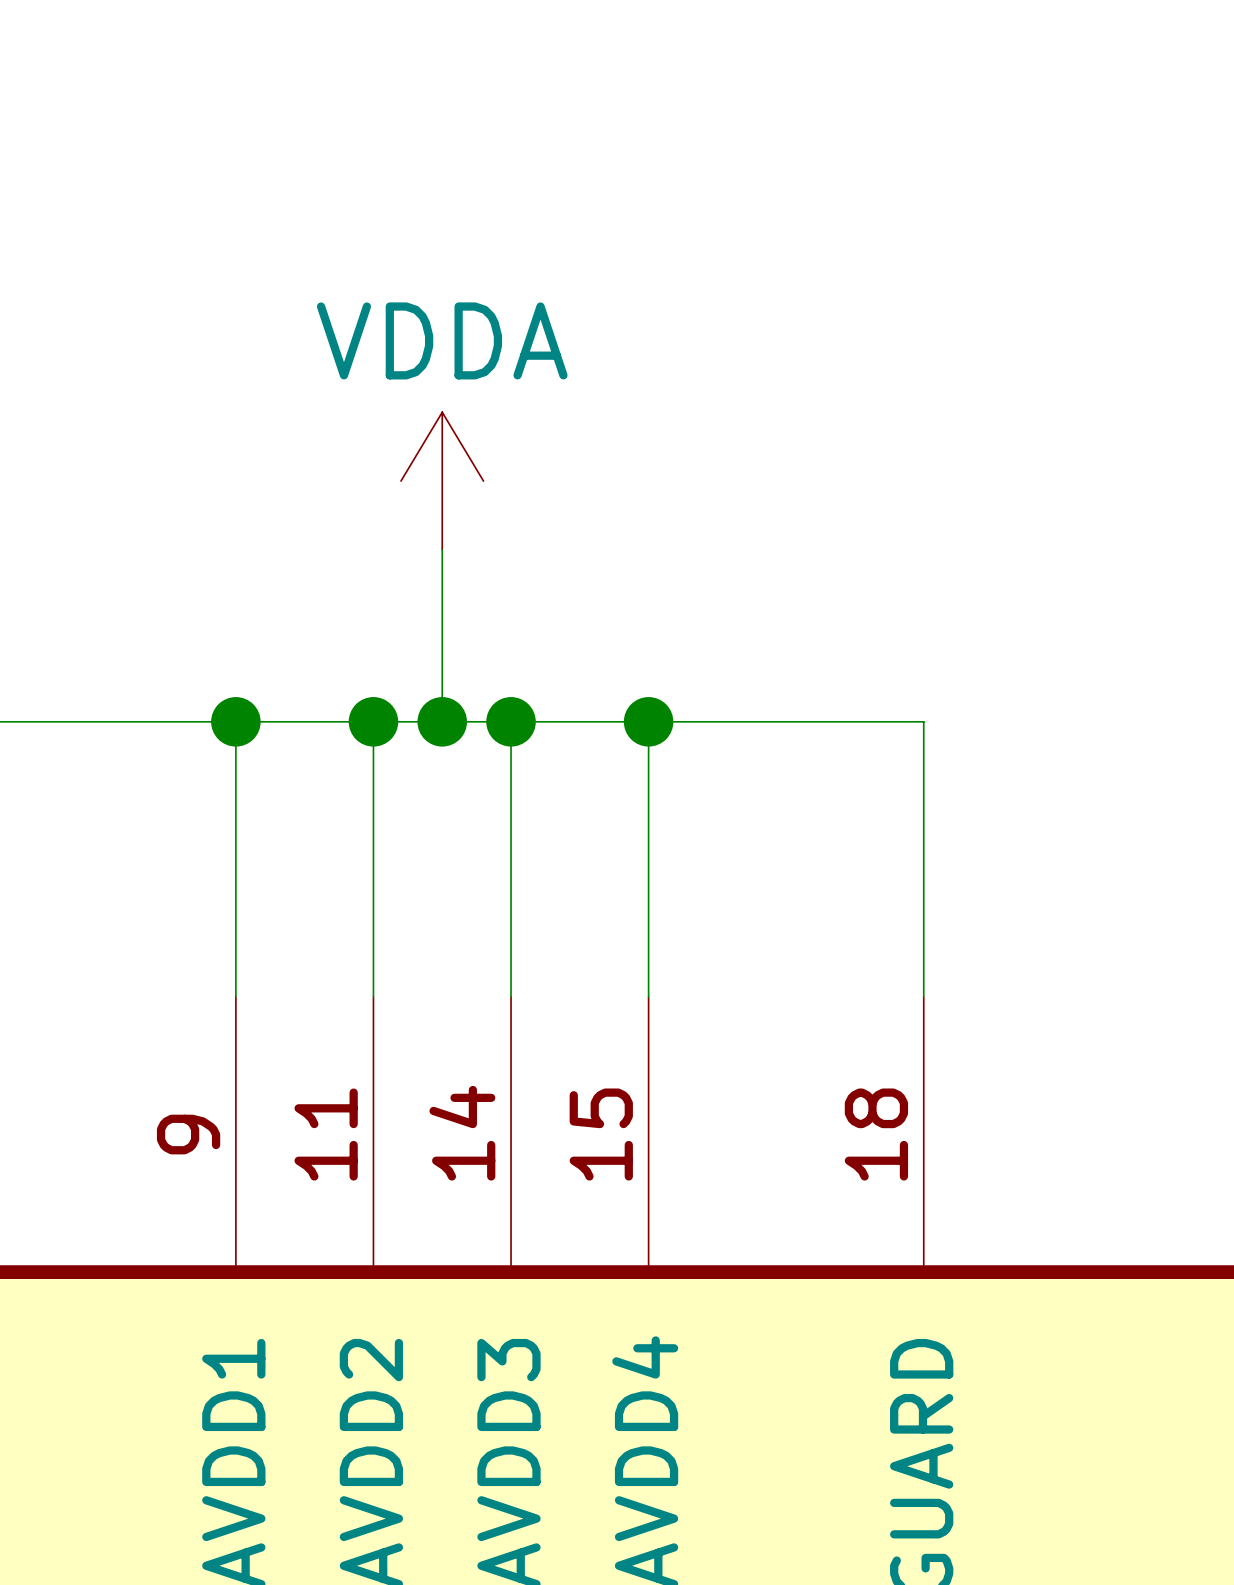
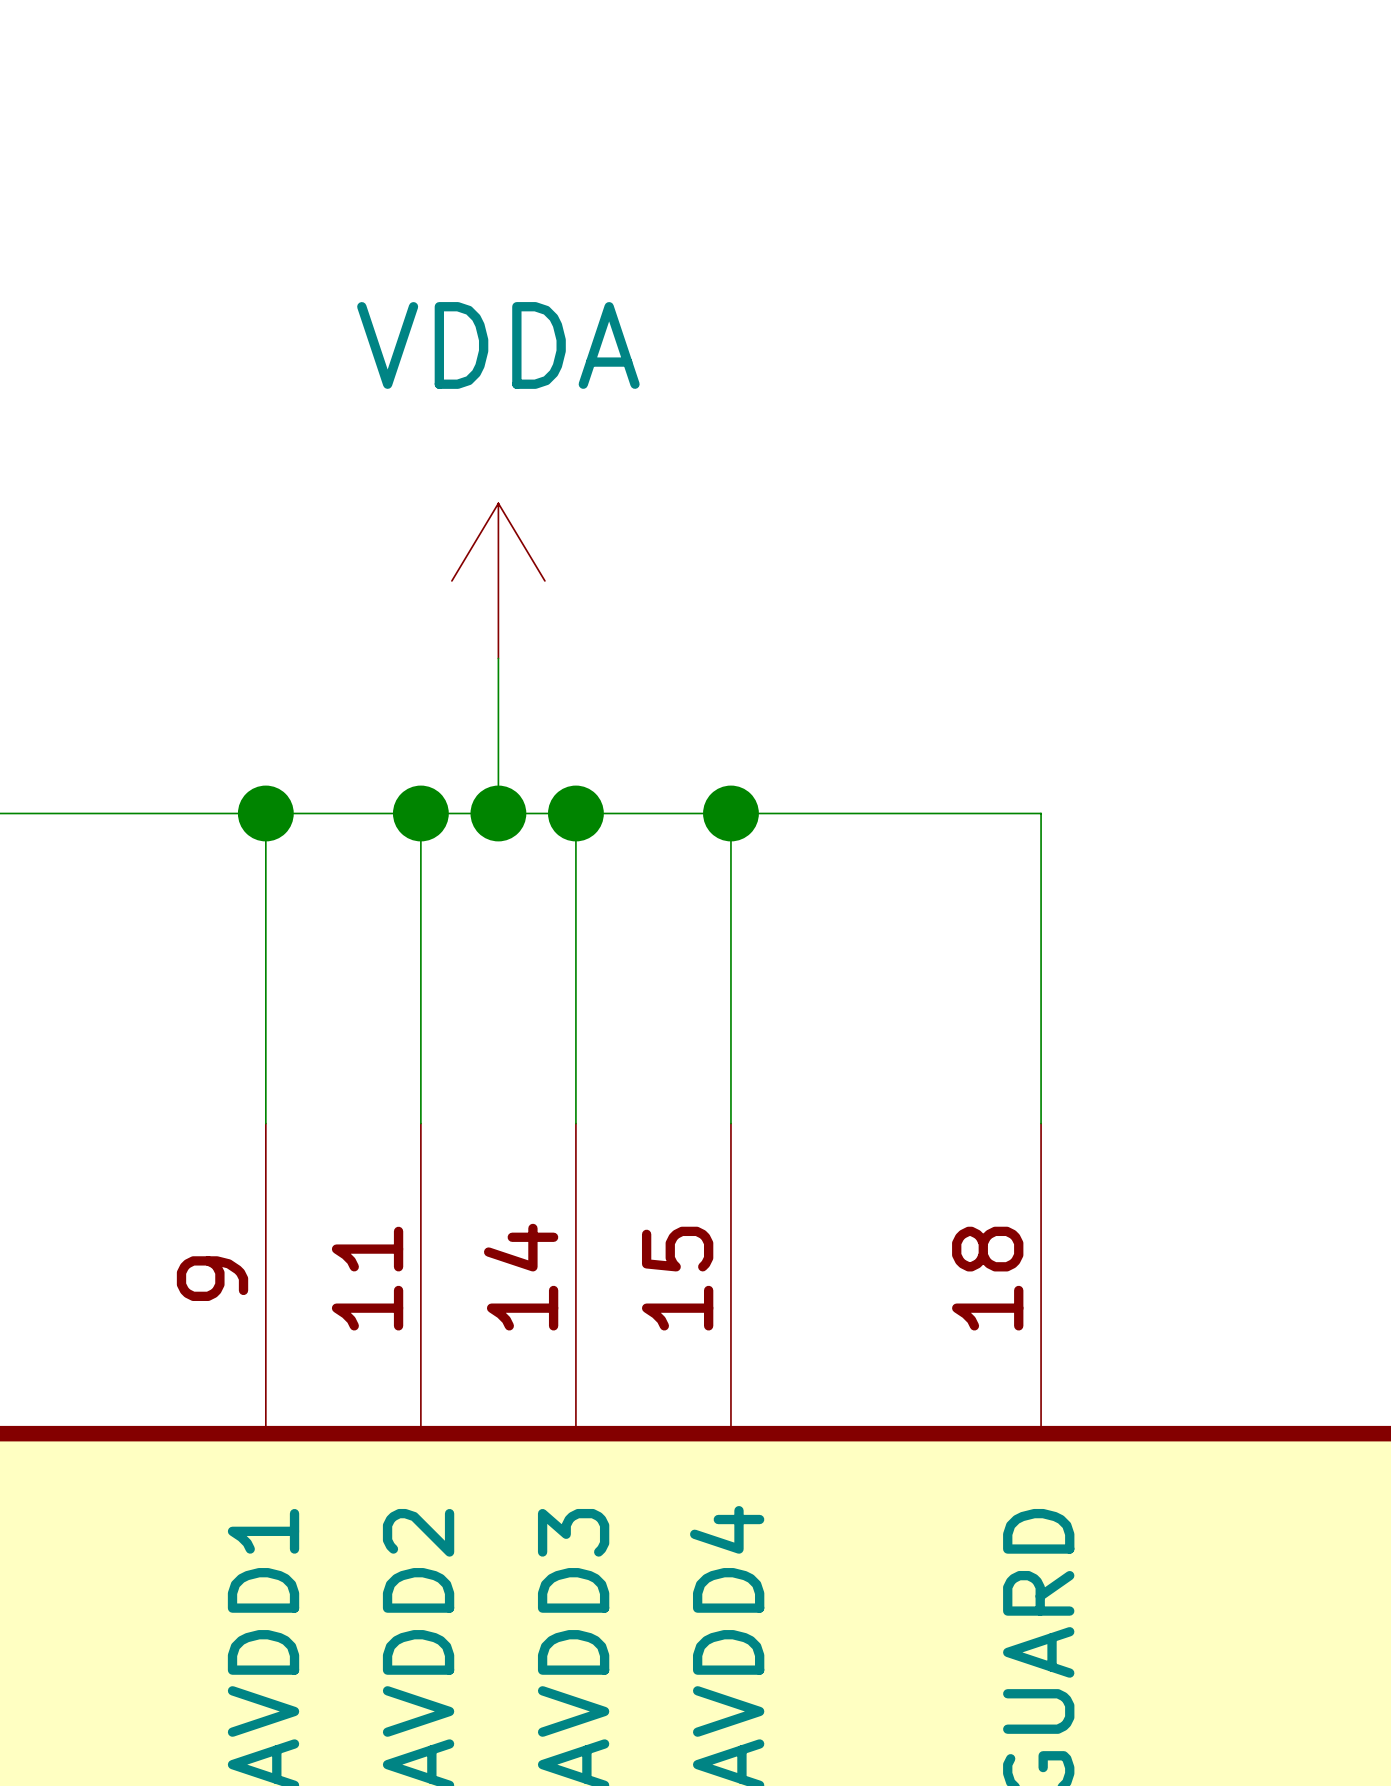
power symbol text position: VDDA (442, 340) -> VDDA (498, 345)
power symbol position: VDDA (442, 481) -> VDDA (498, 580)

